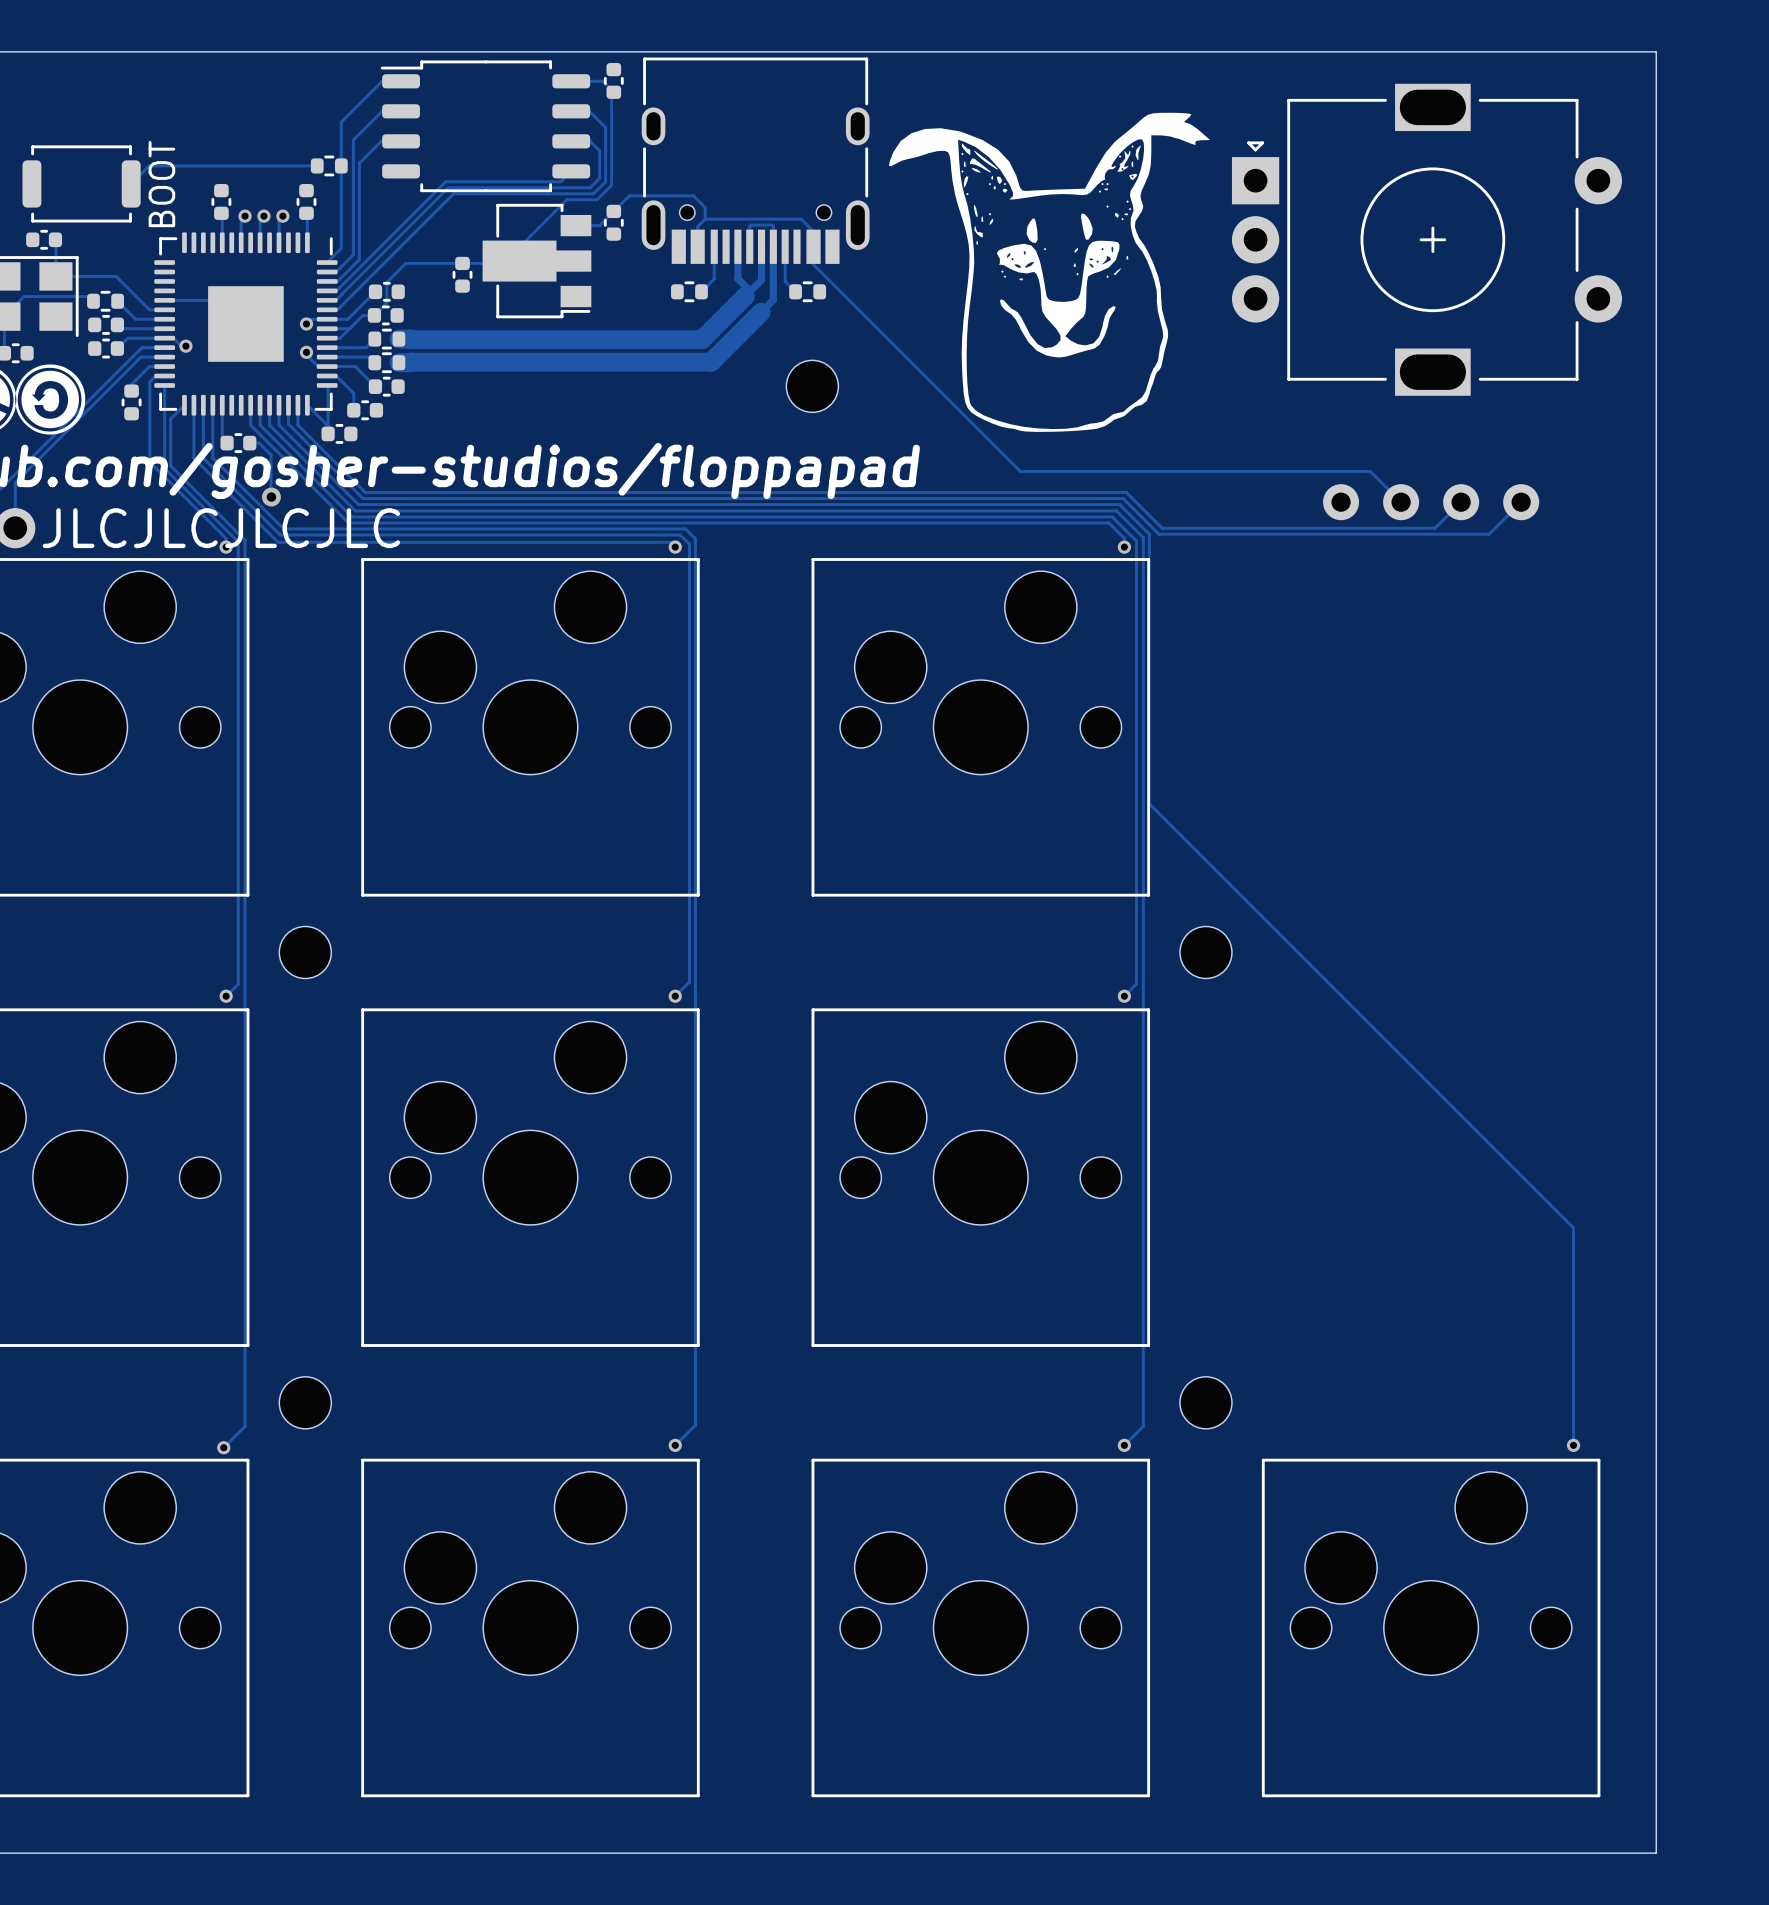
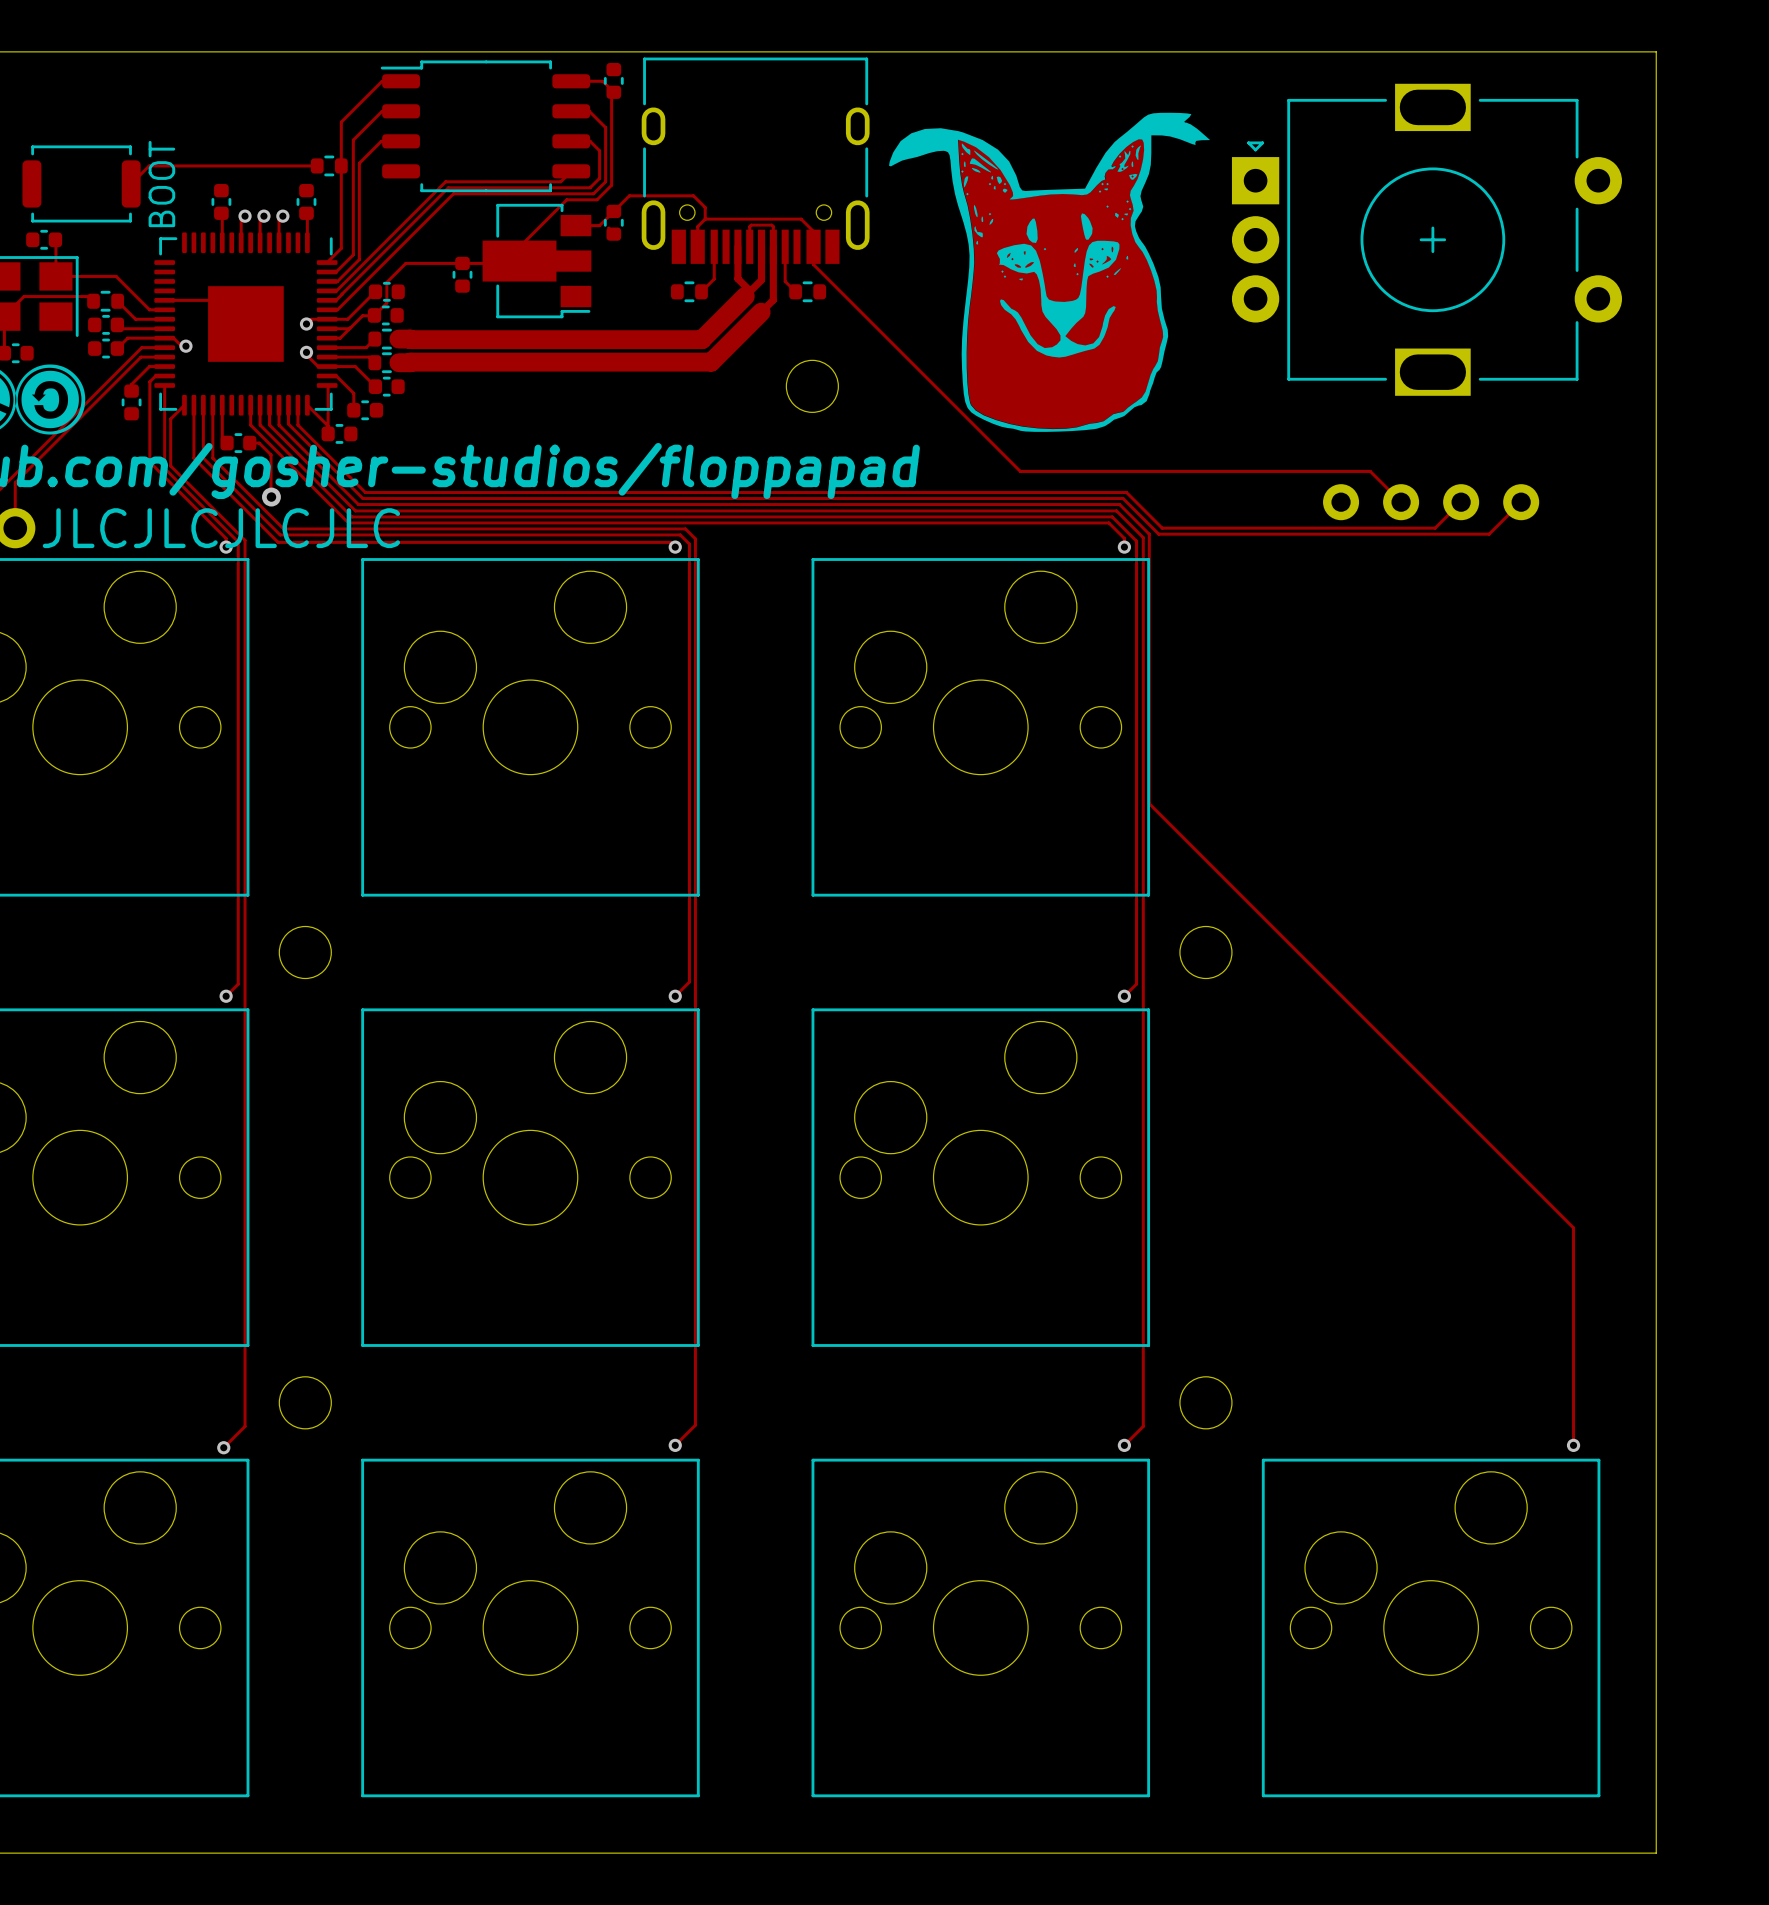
drawing: none -> [958, 139, 1164, 429]

